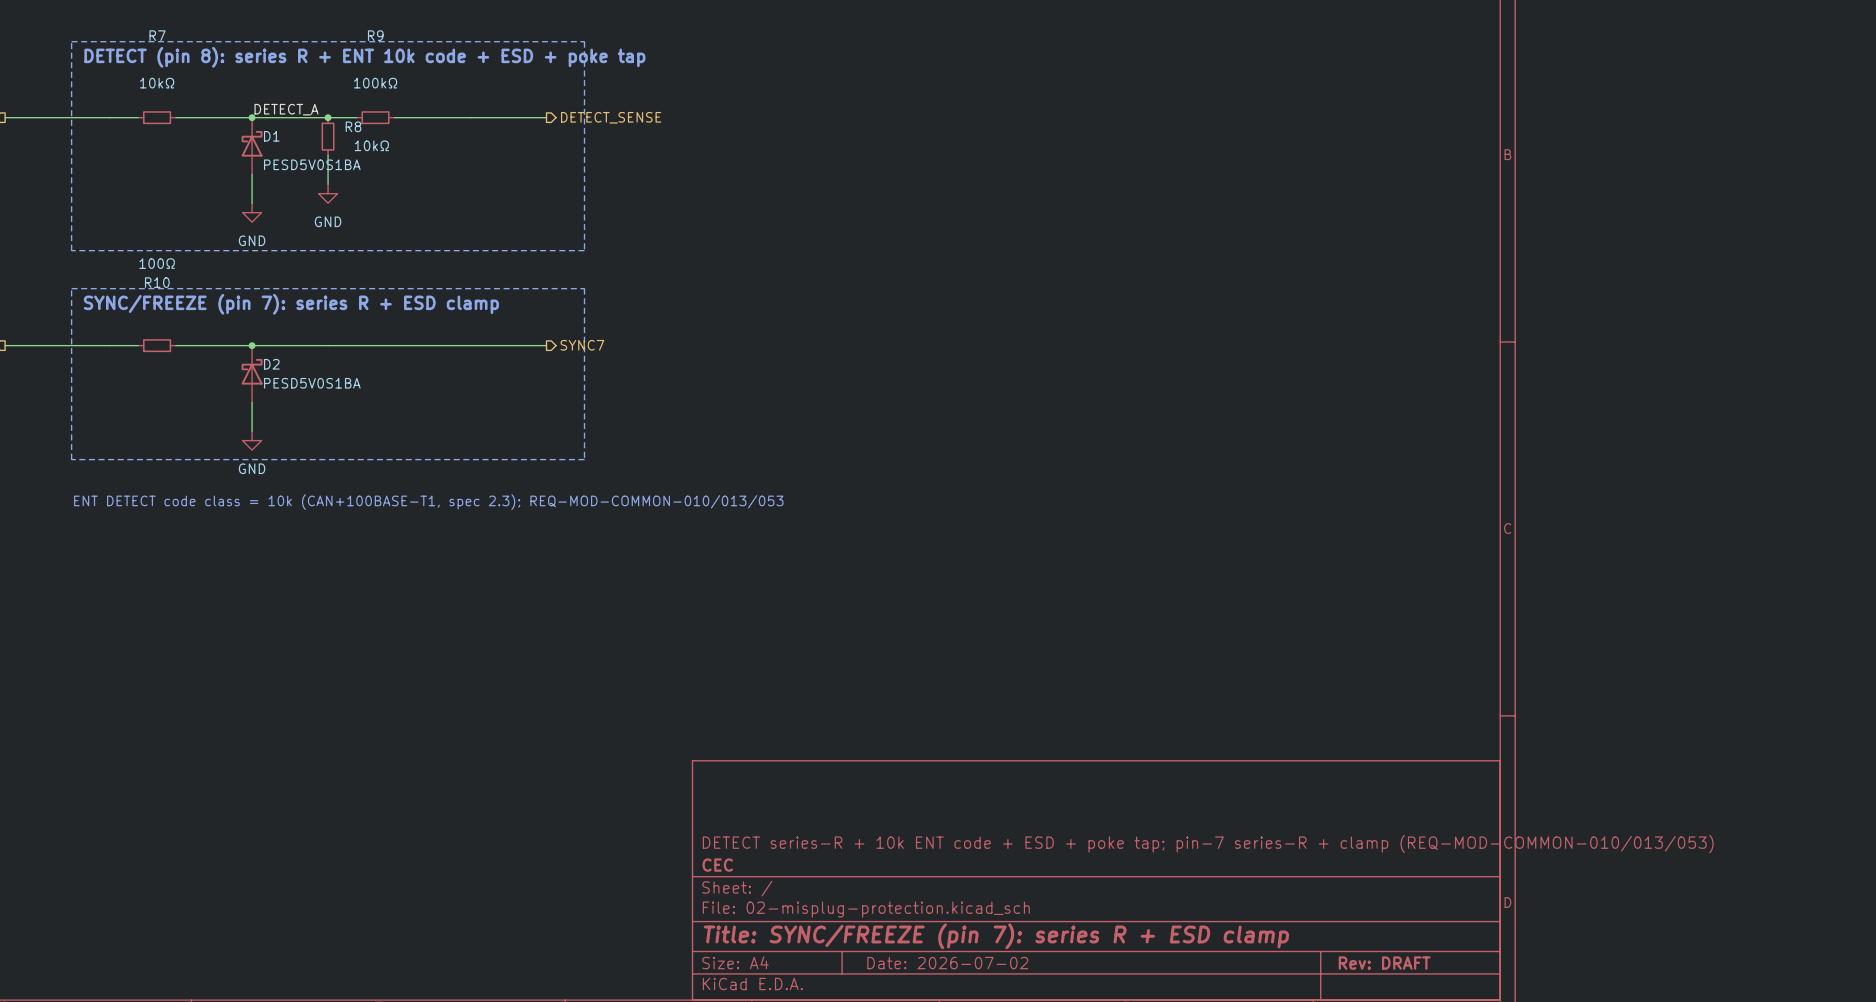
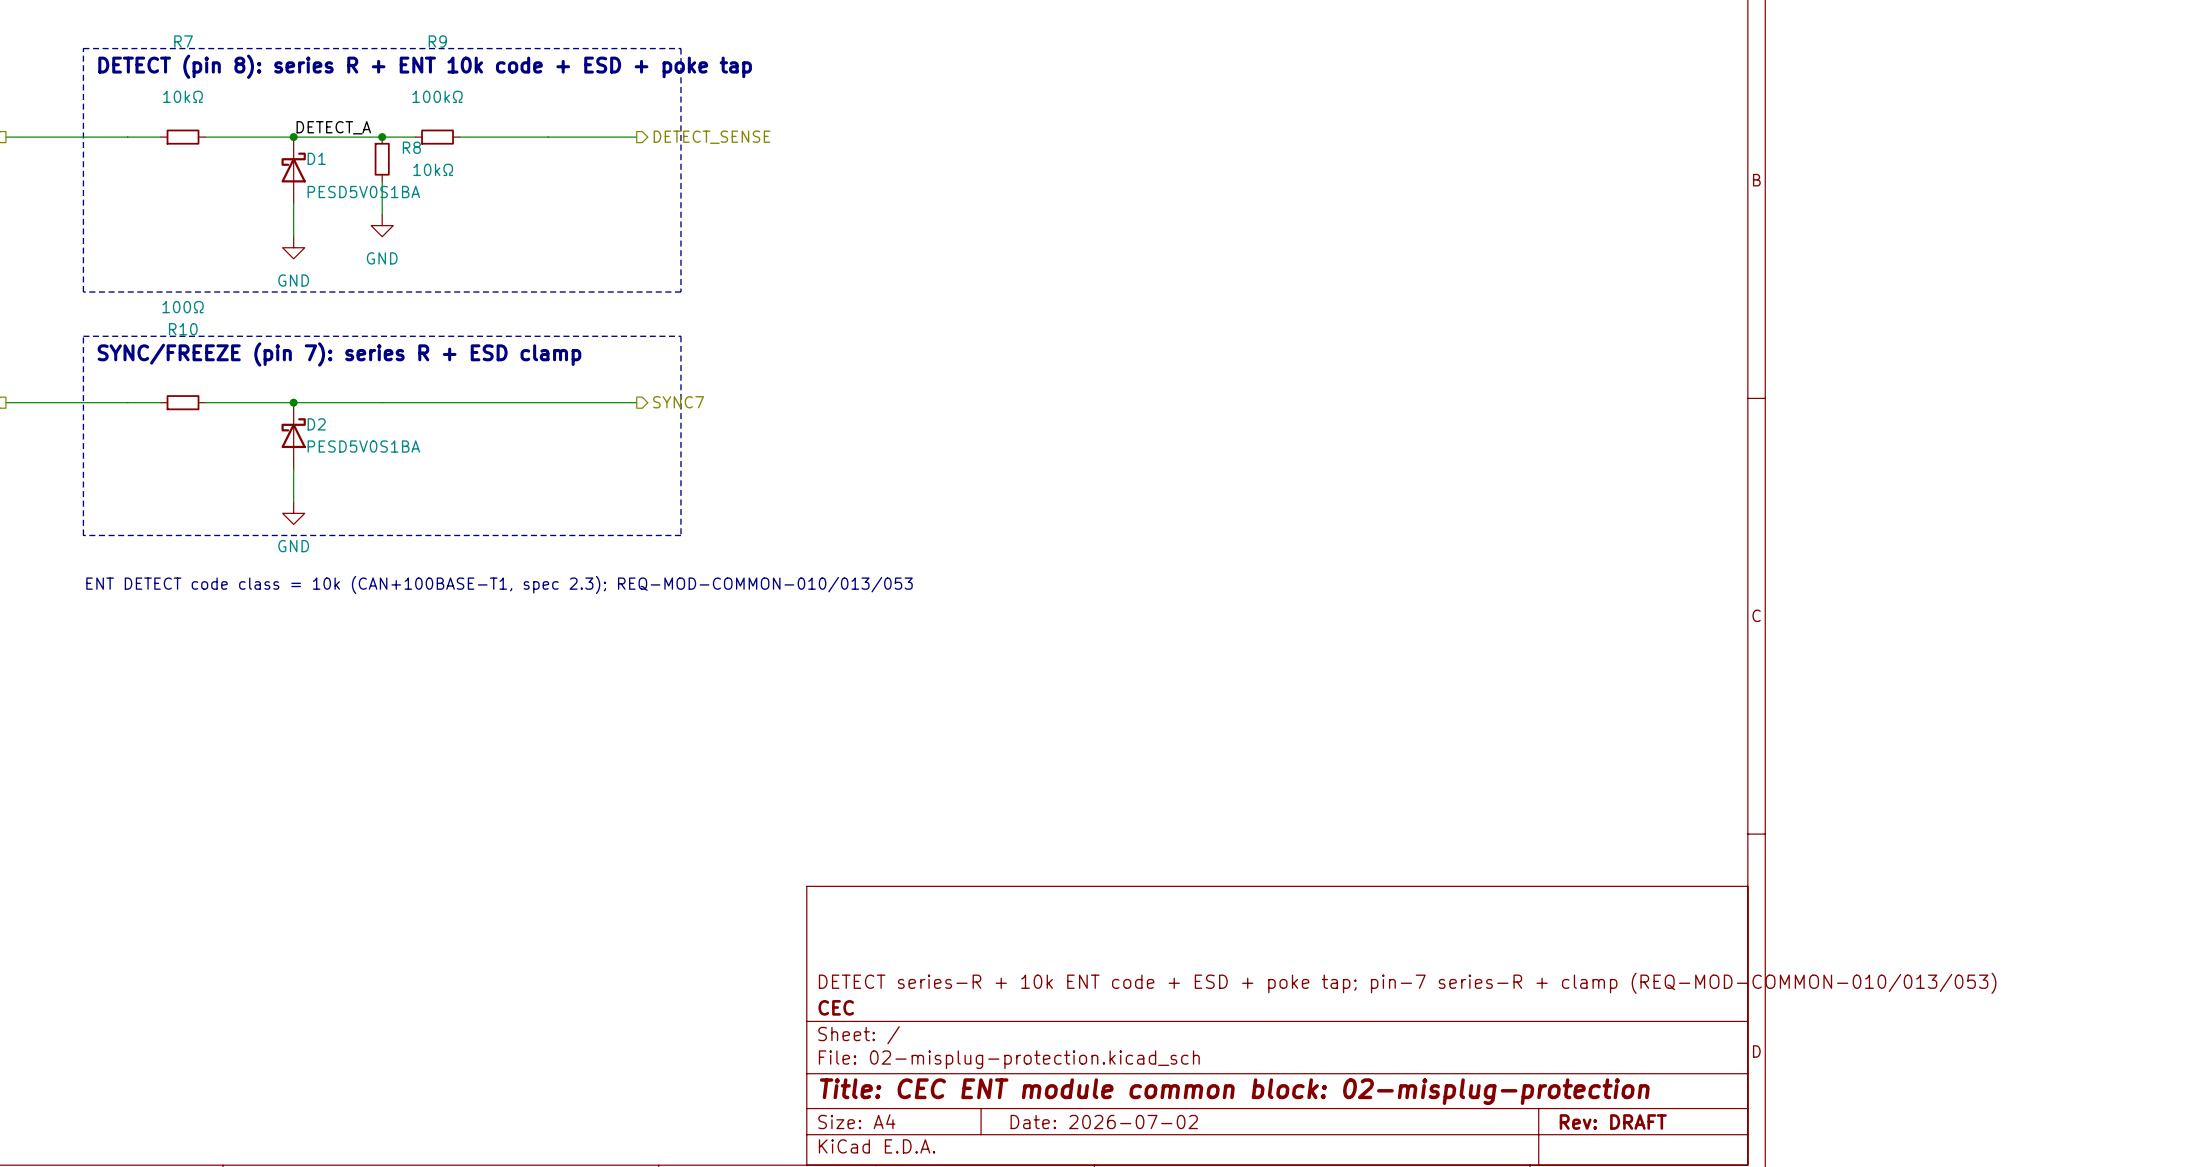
title block: Title: SYNC/FREEZE (pin 7): series R + ESD clamp (996, 936) -> Title: CEC ENT module common block: 02-misplug-protection (1234, 1091)

